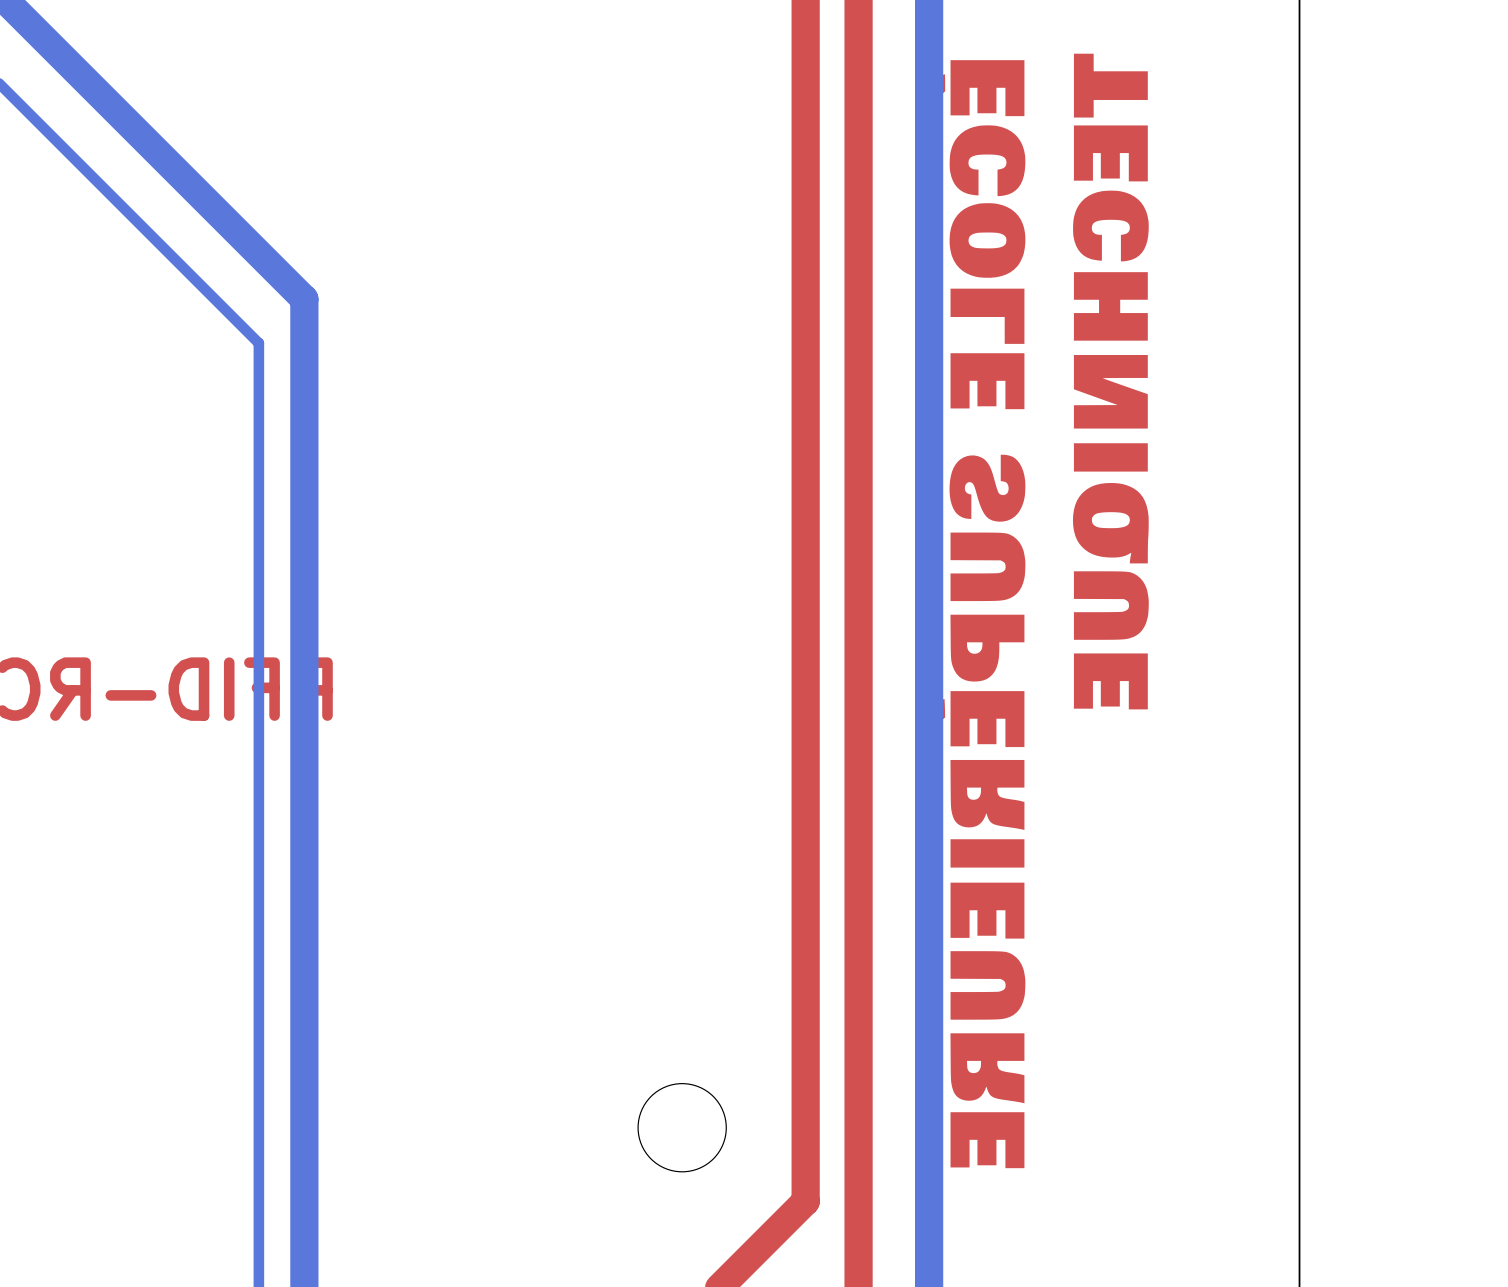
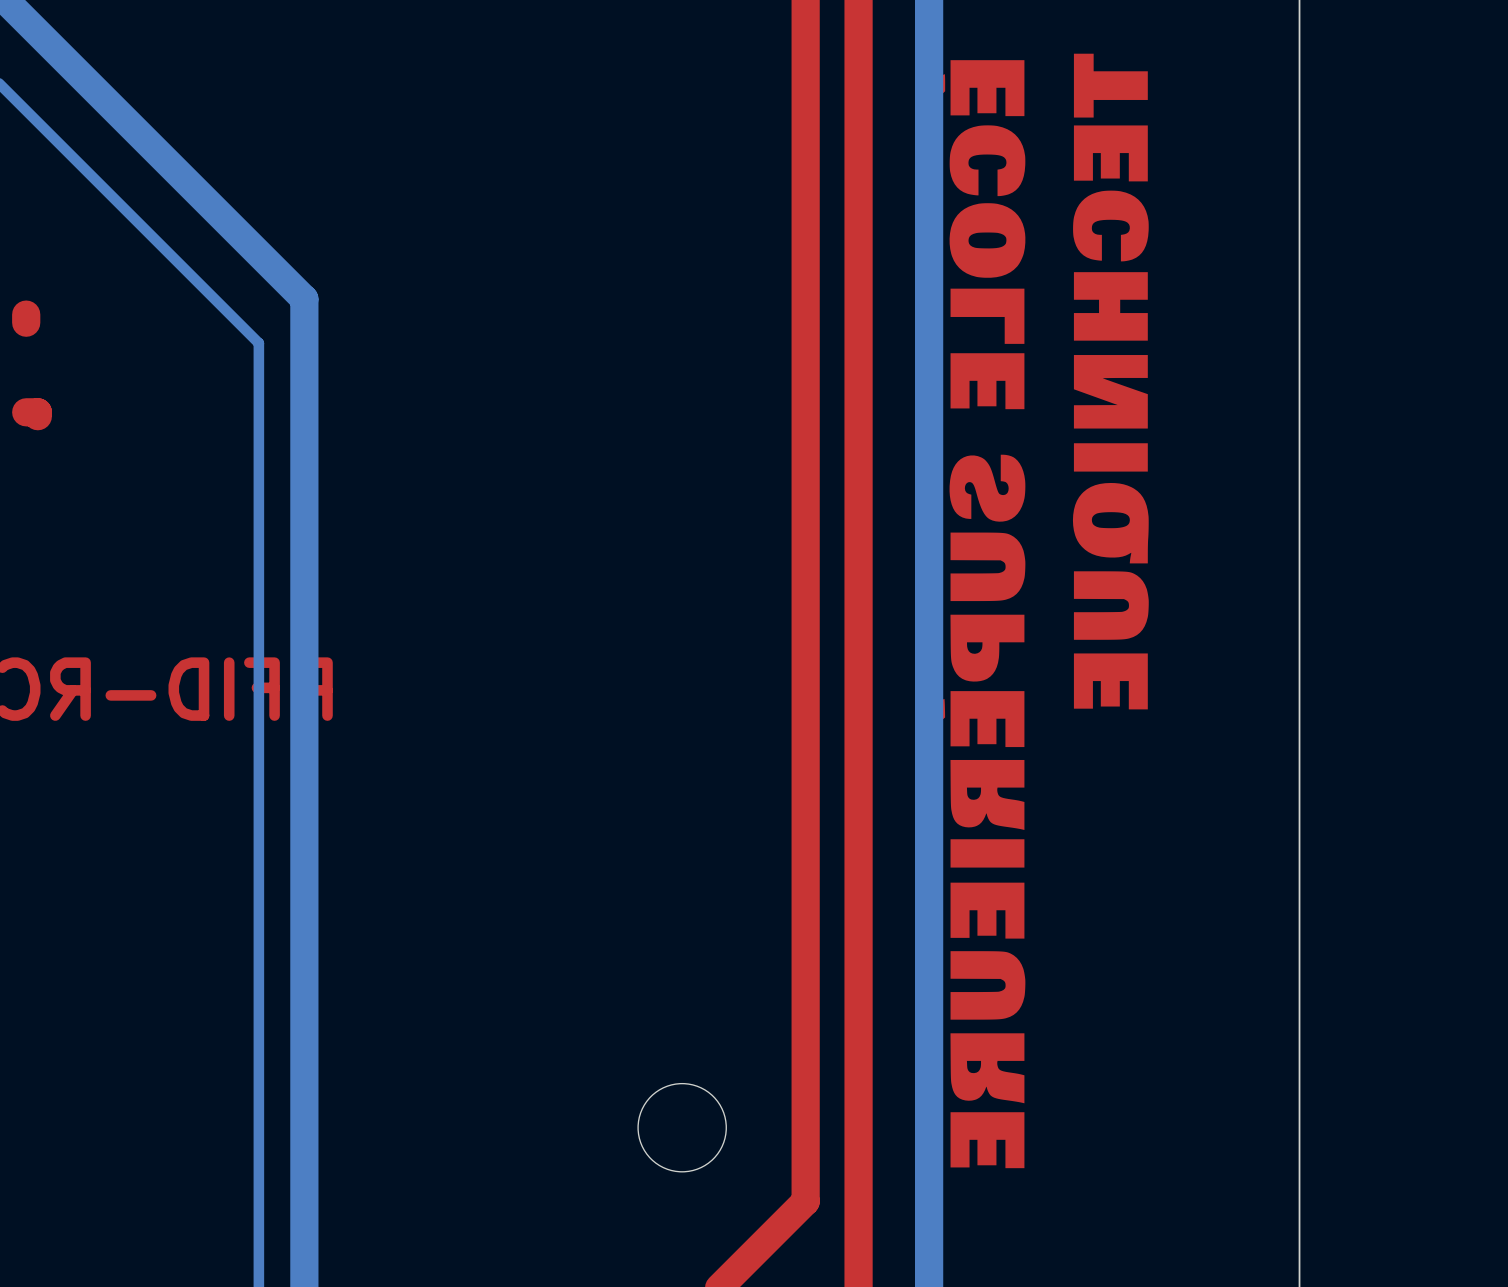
top track: none -> (26, 314) (26, 322)
top track: none -> (26, 412) (37, 412) (37, 416)

